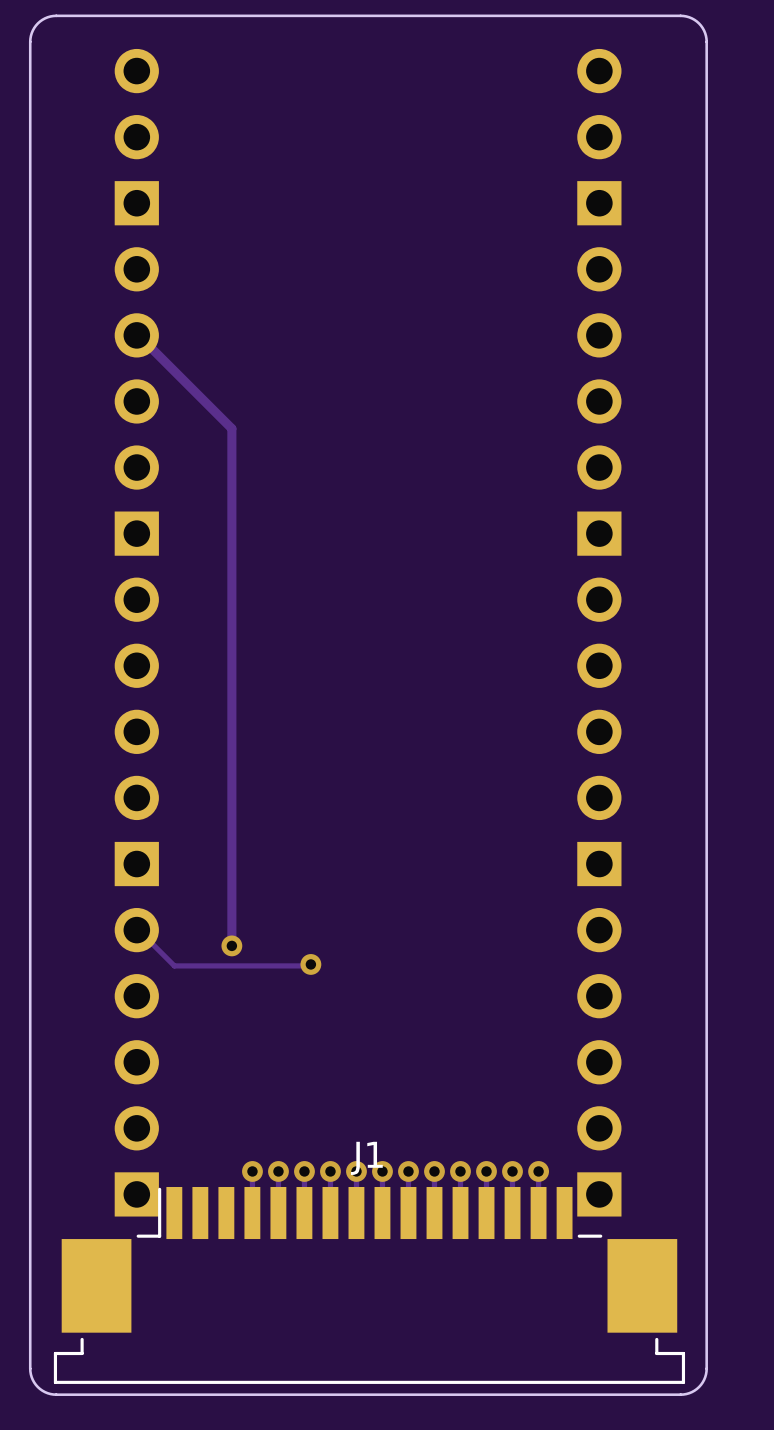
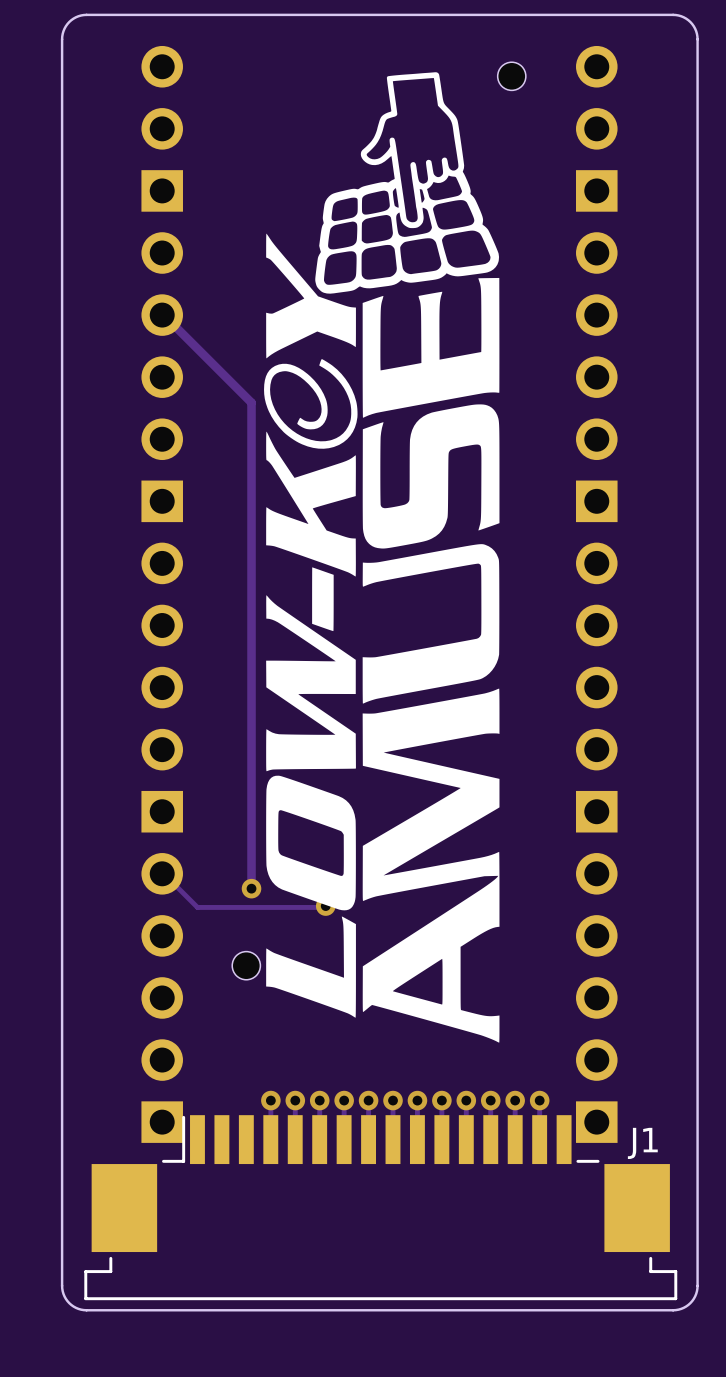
drawing: none -> [264, 72, 500, 1043]
part: none -> (511, 76)
part: none -> (246, 965)
J1 name position: J1 (366, 1158) -> J1 (642, 1143)

